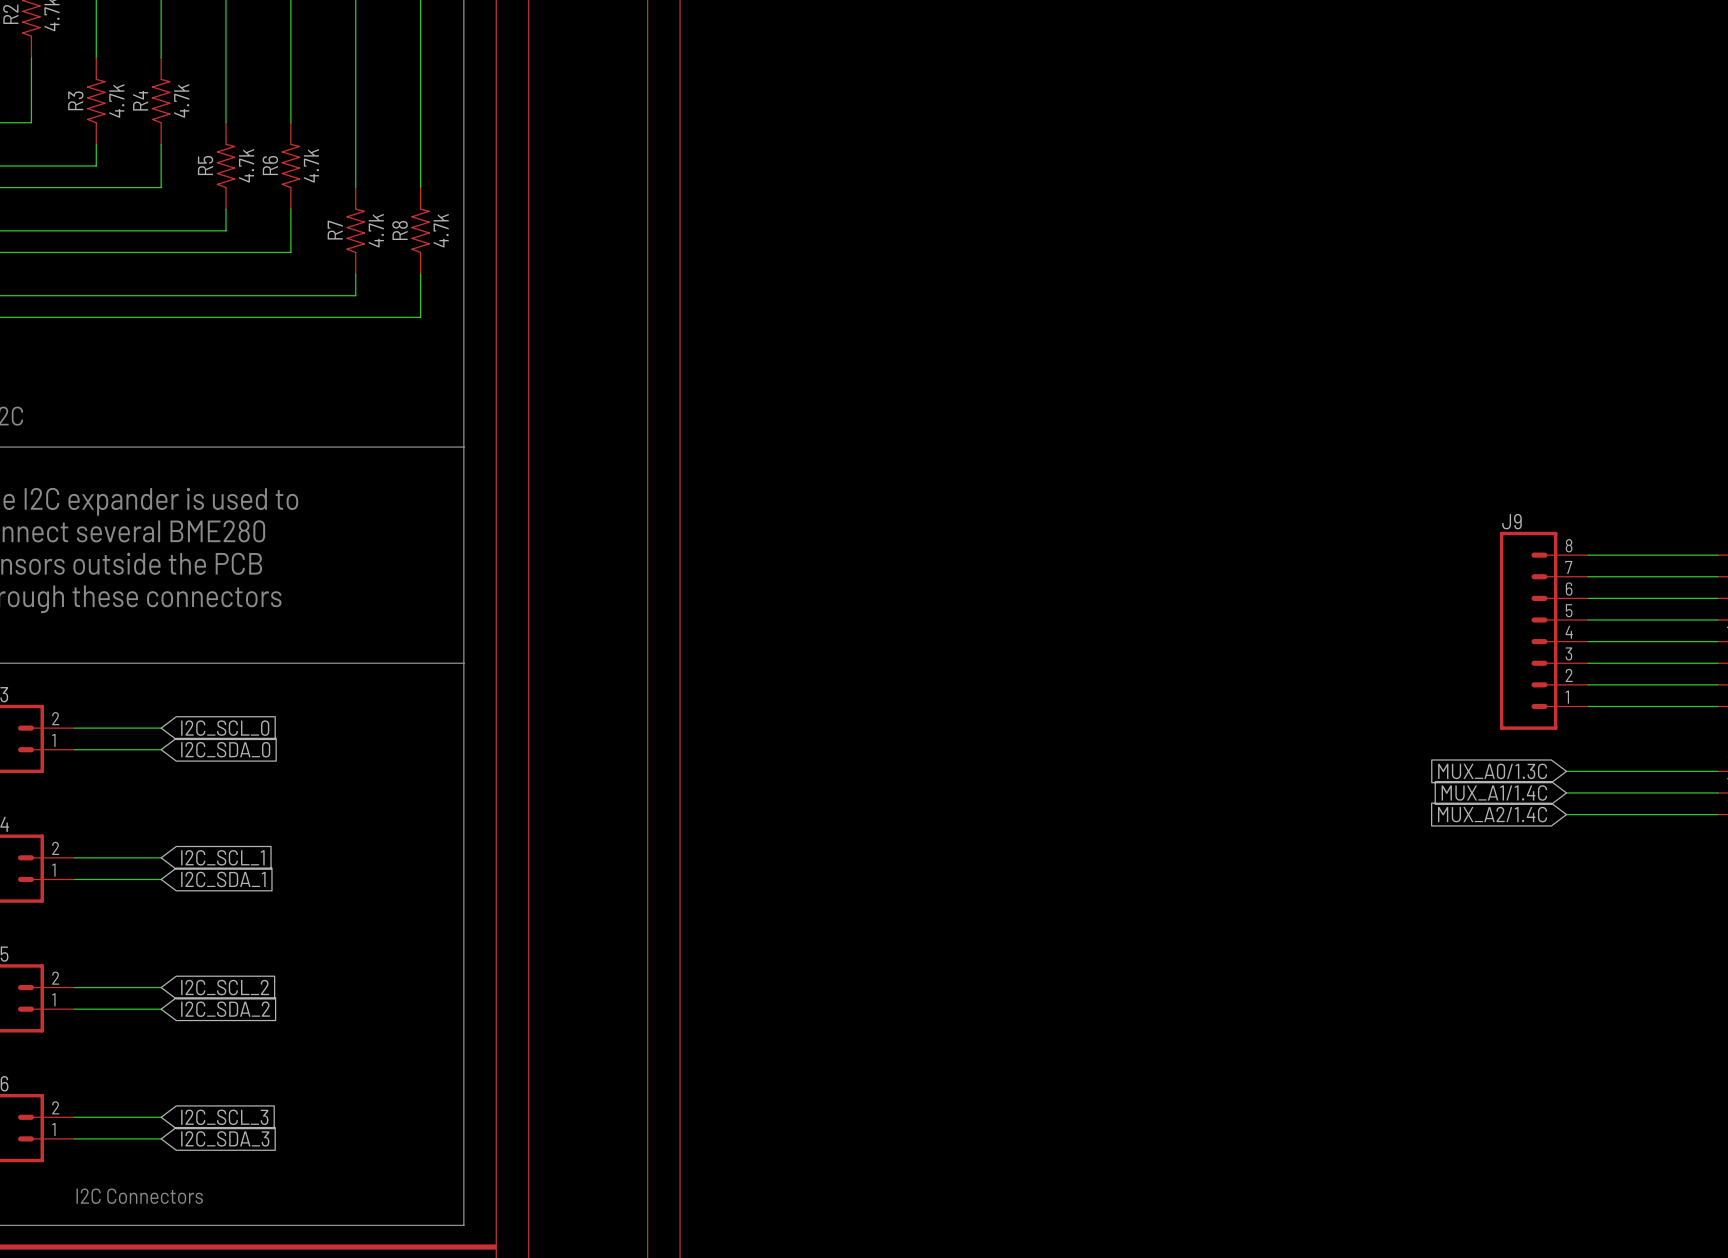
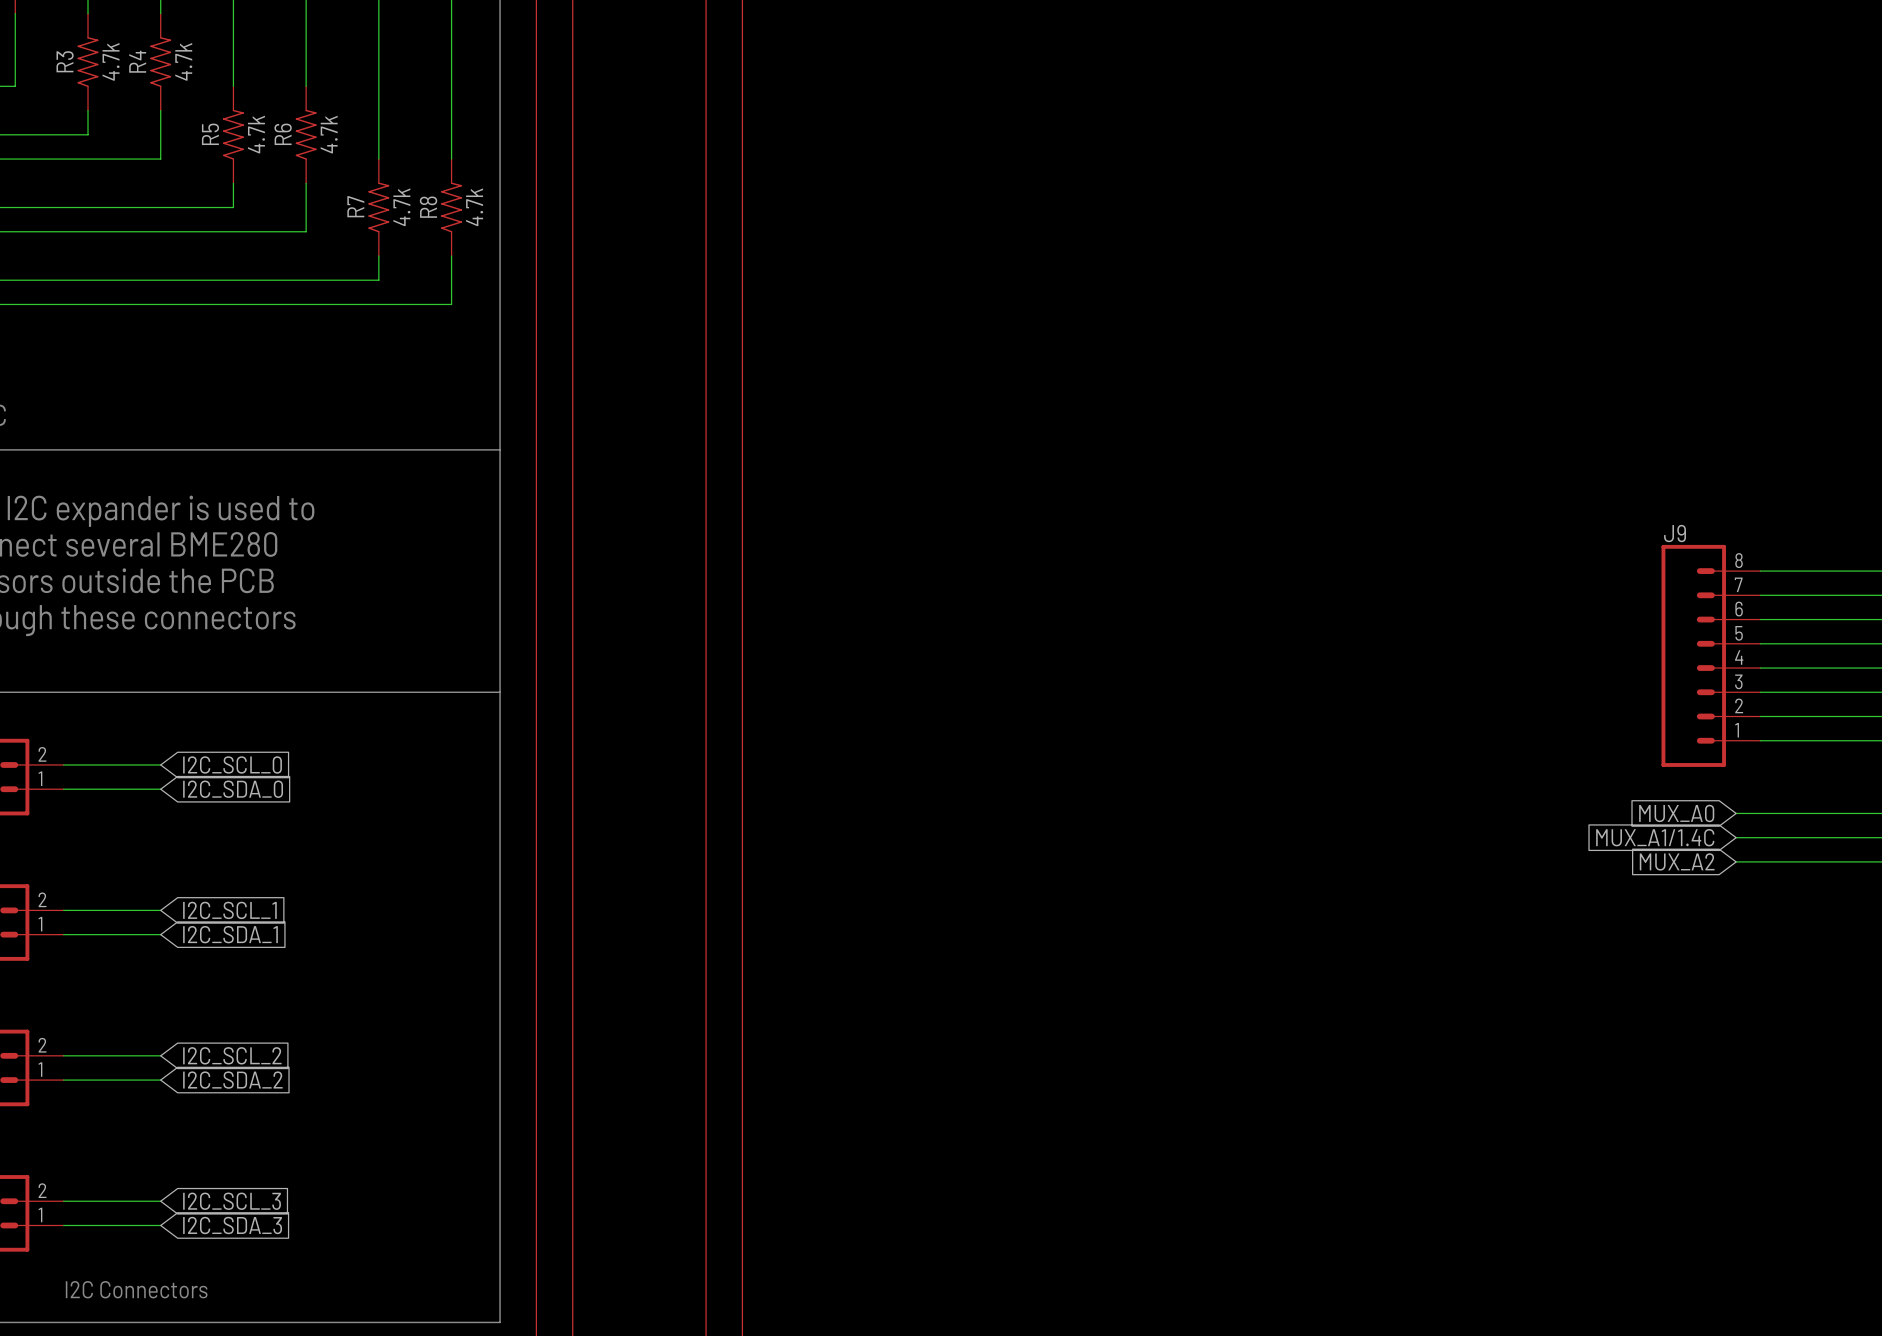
global label: MUX_A0/1.3C (1492, 771) -> MUX_A0 (1676, 813)
global label: MUX_A2/1.4C (1492, 814) -> MUX_A2 (1677, 861)

